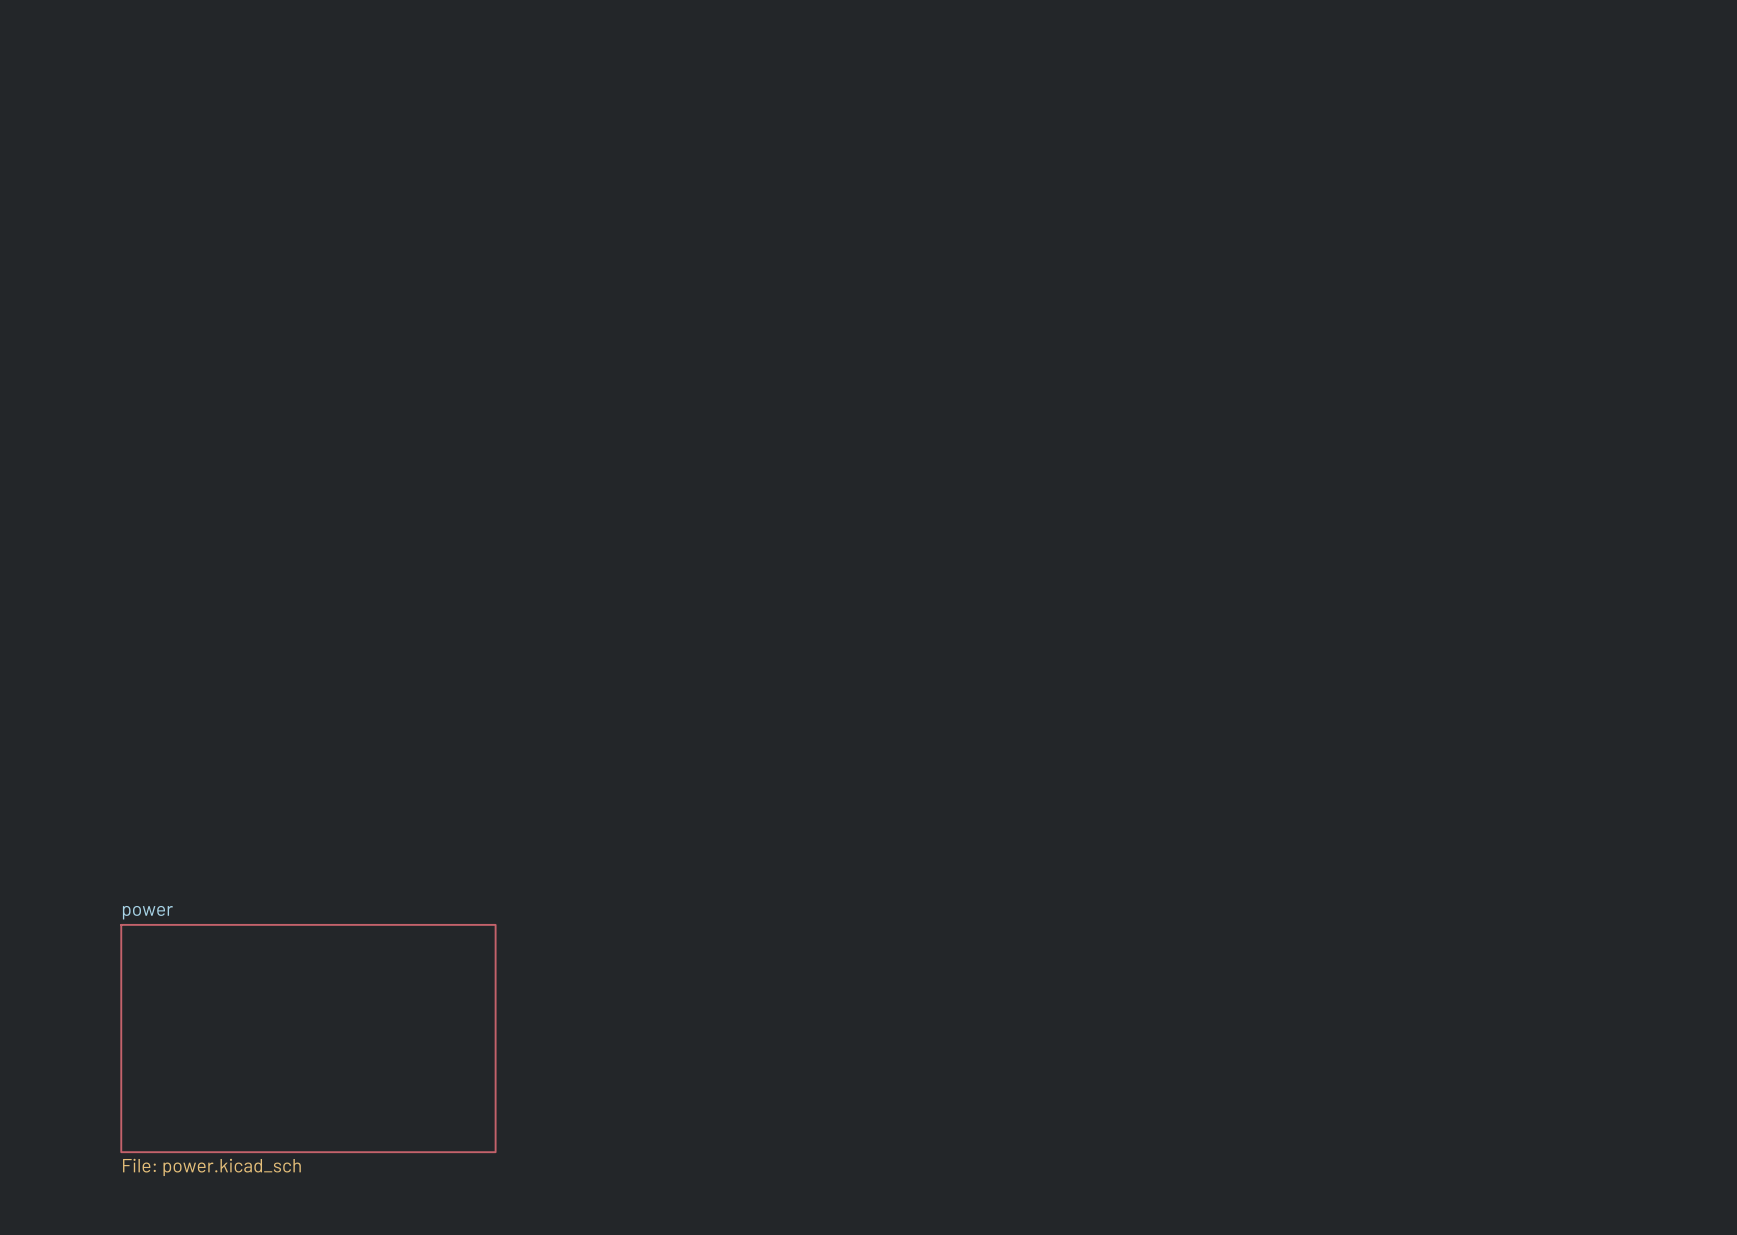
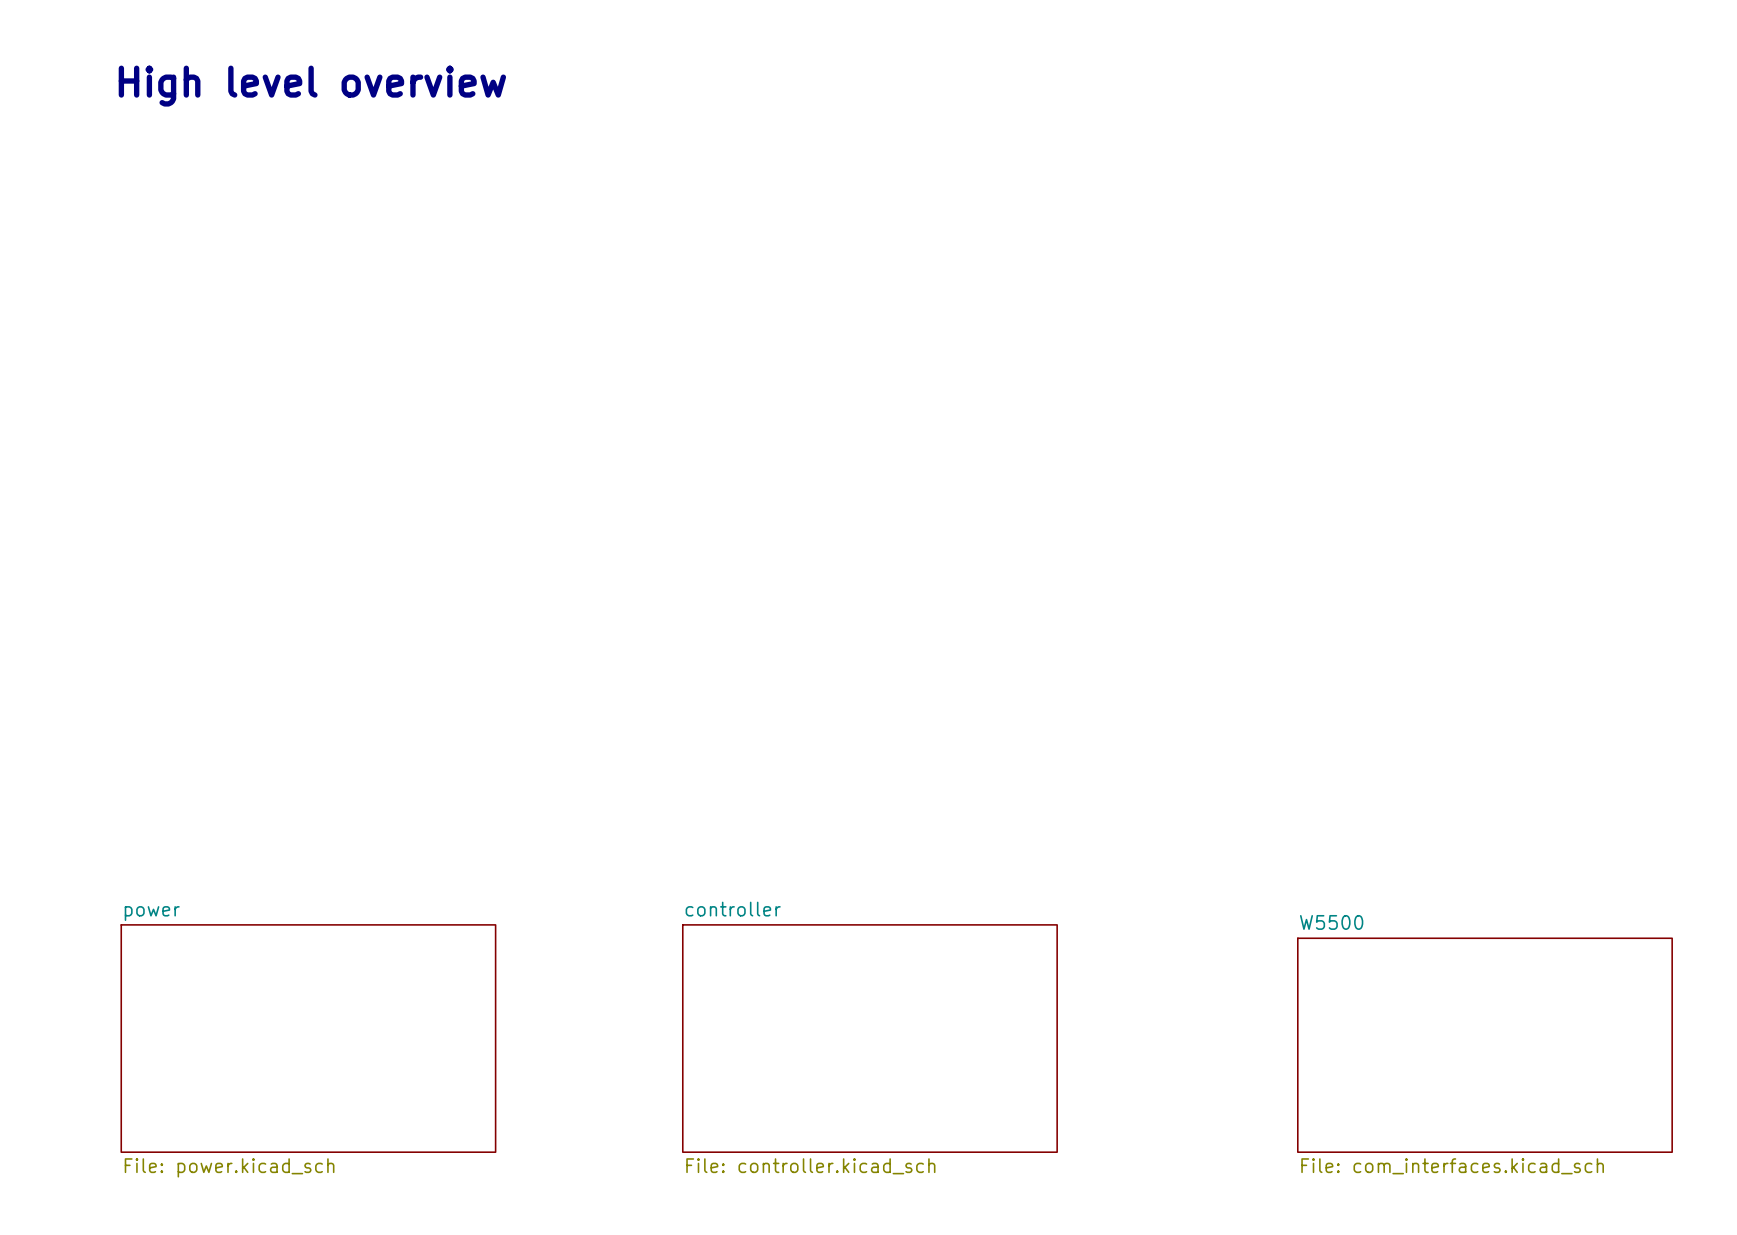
text: none -> High level overview (312, 86)
sheet controller: none -> File: controller.kicad_sch (869, 1038)
sheet W5500: none -> File: com_interfaces.kicad_sch (1484, 1045)

